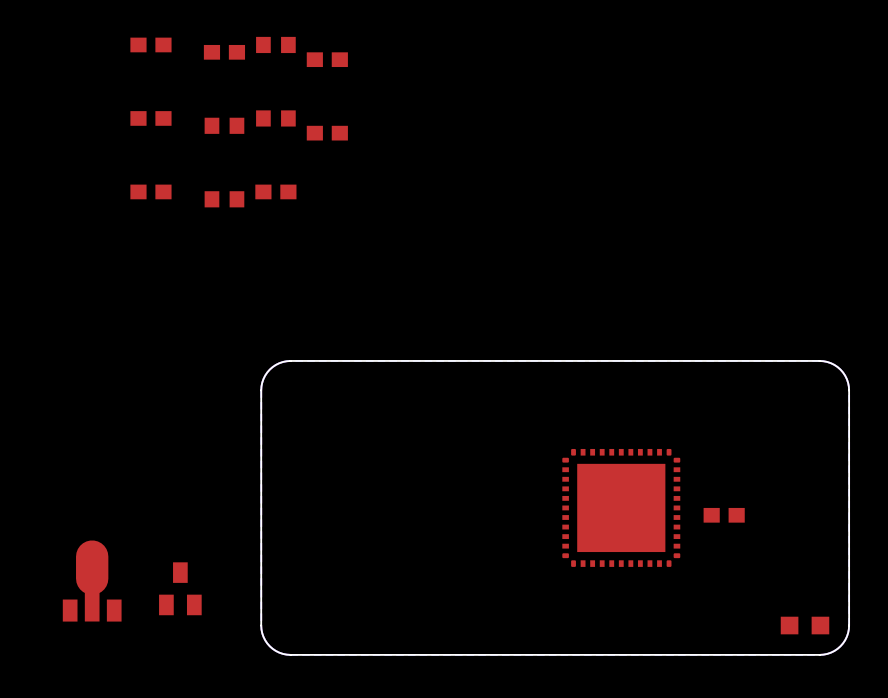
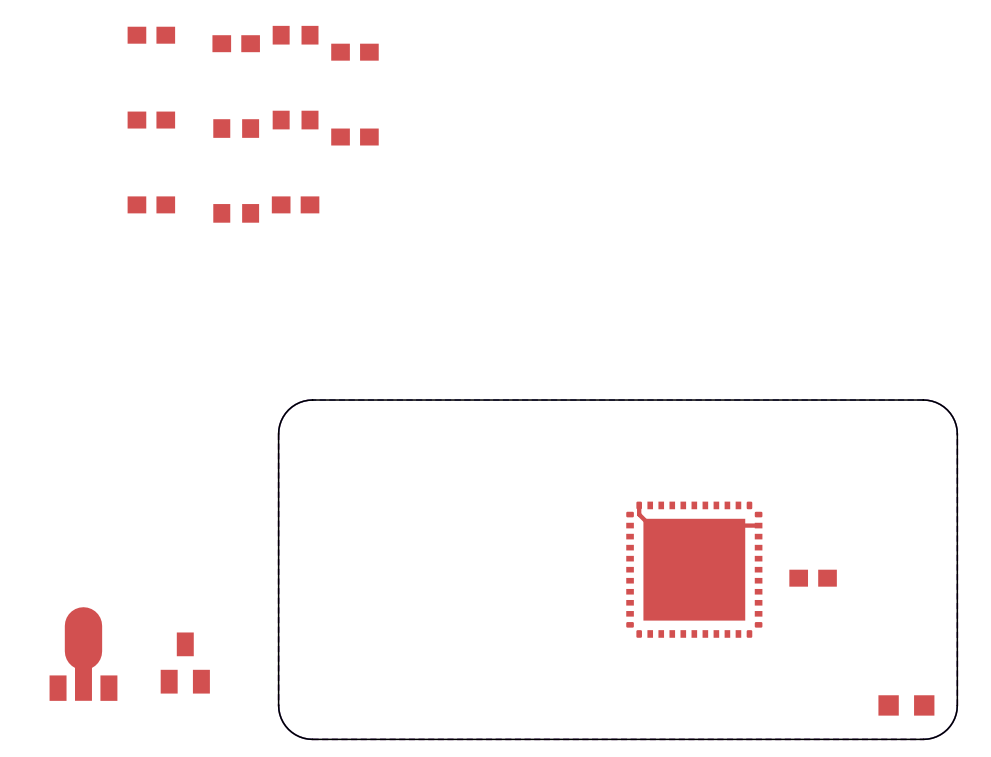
top track: none -> (639, 505) (639, 514) (647, 523)
top track: none -> (758, 525) (738, 525) (736, 527)

